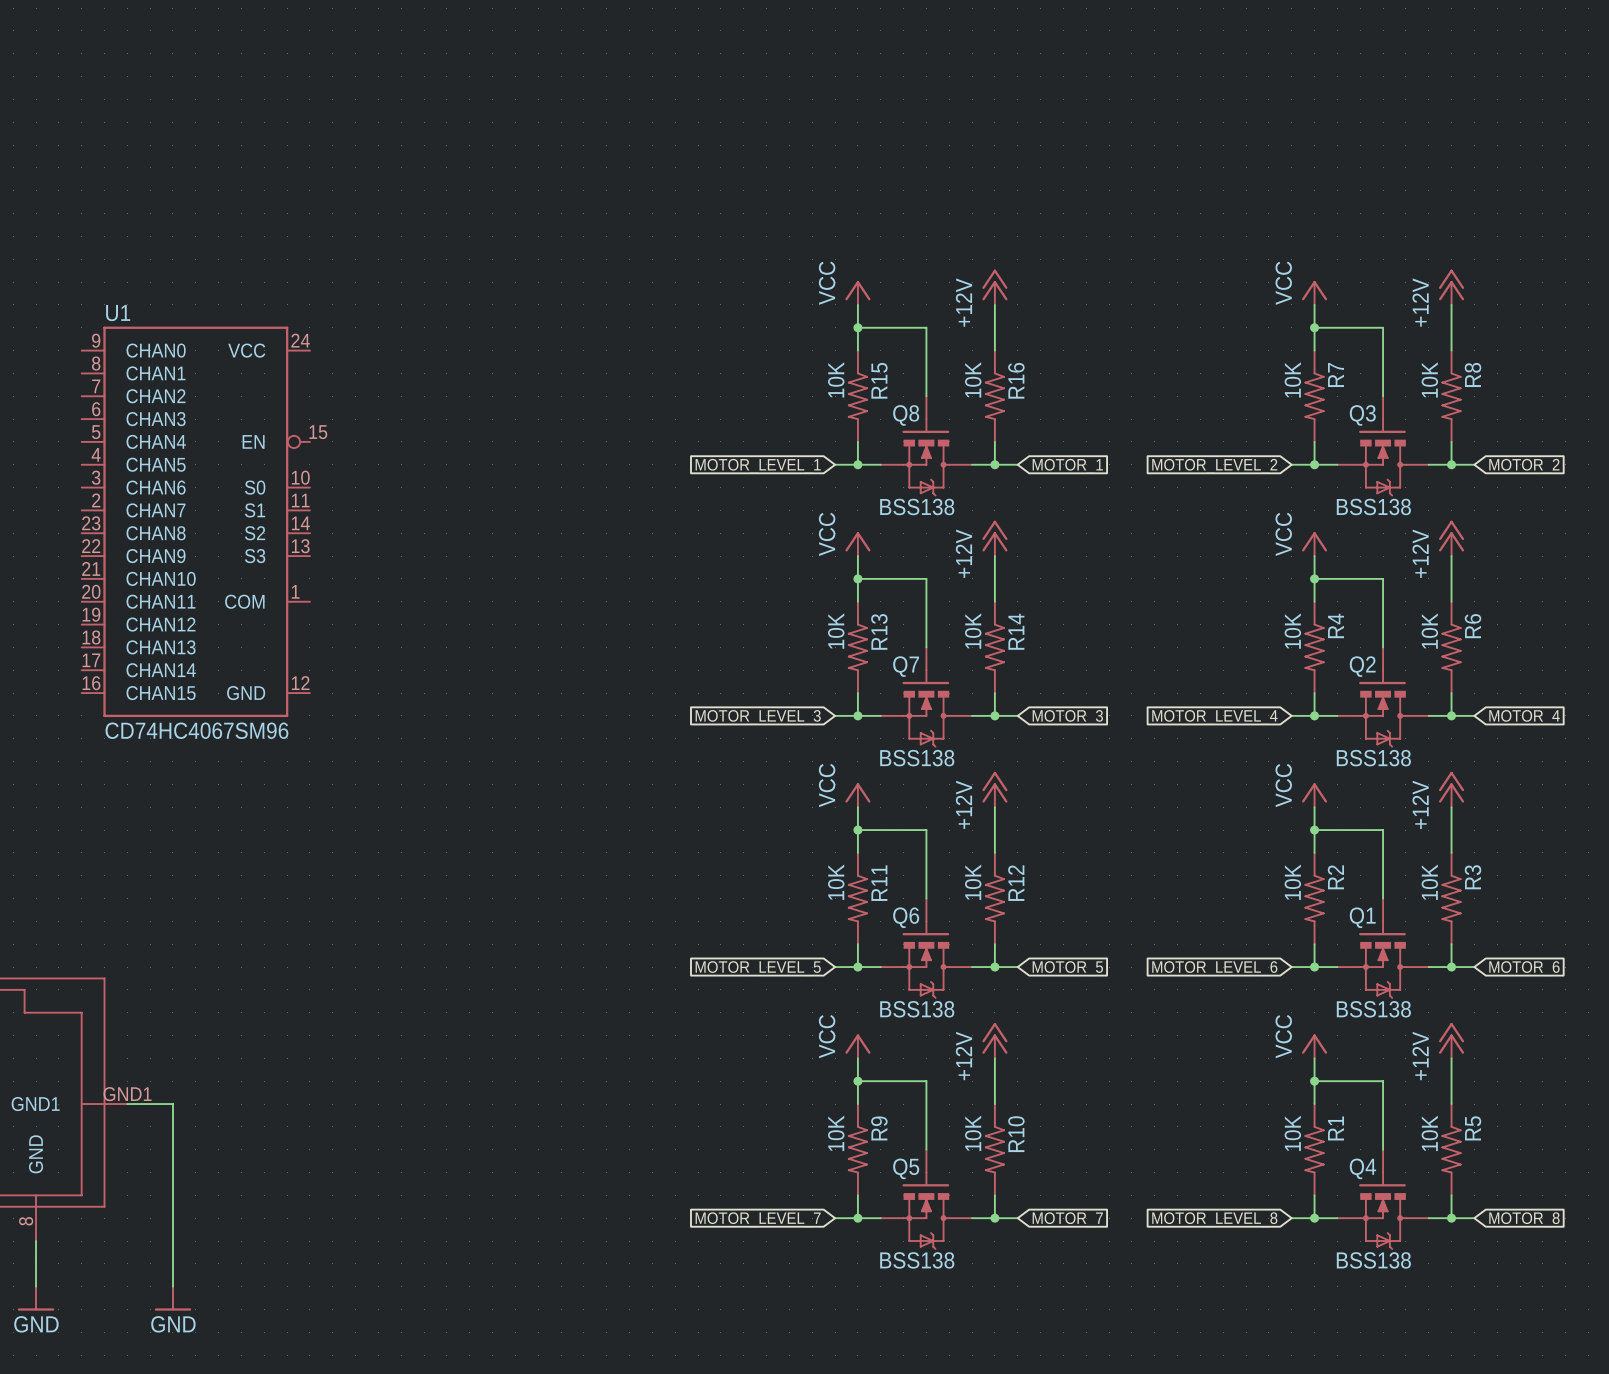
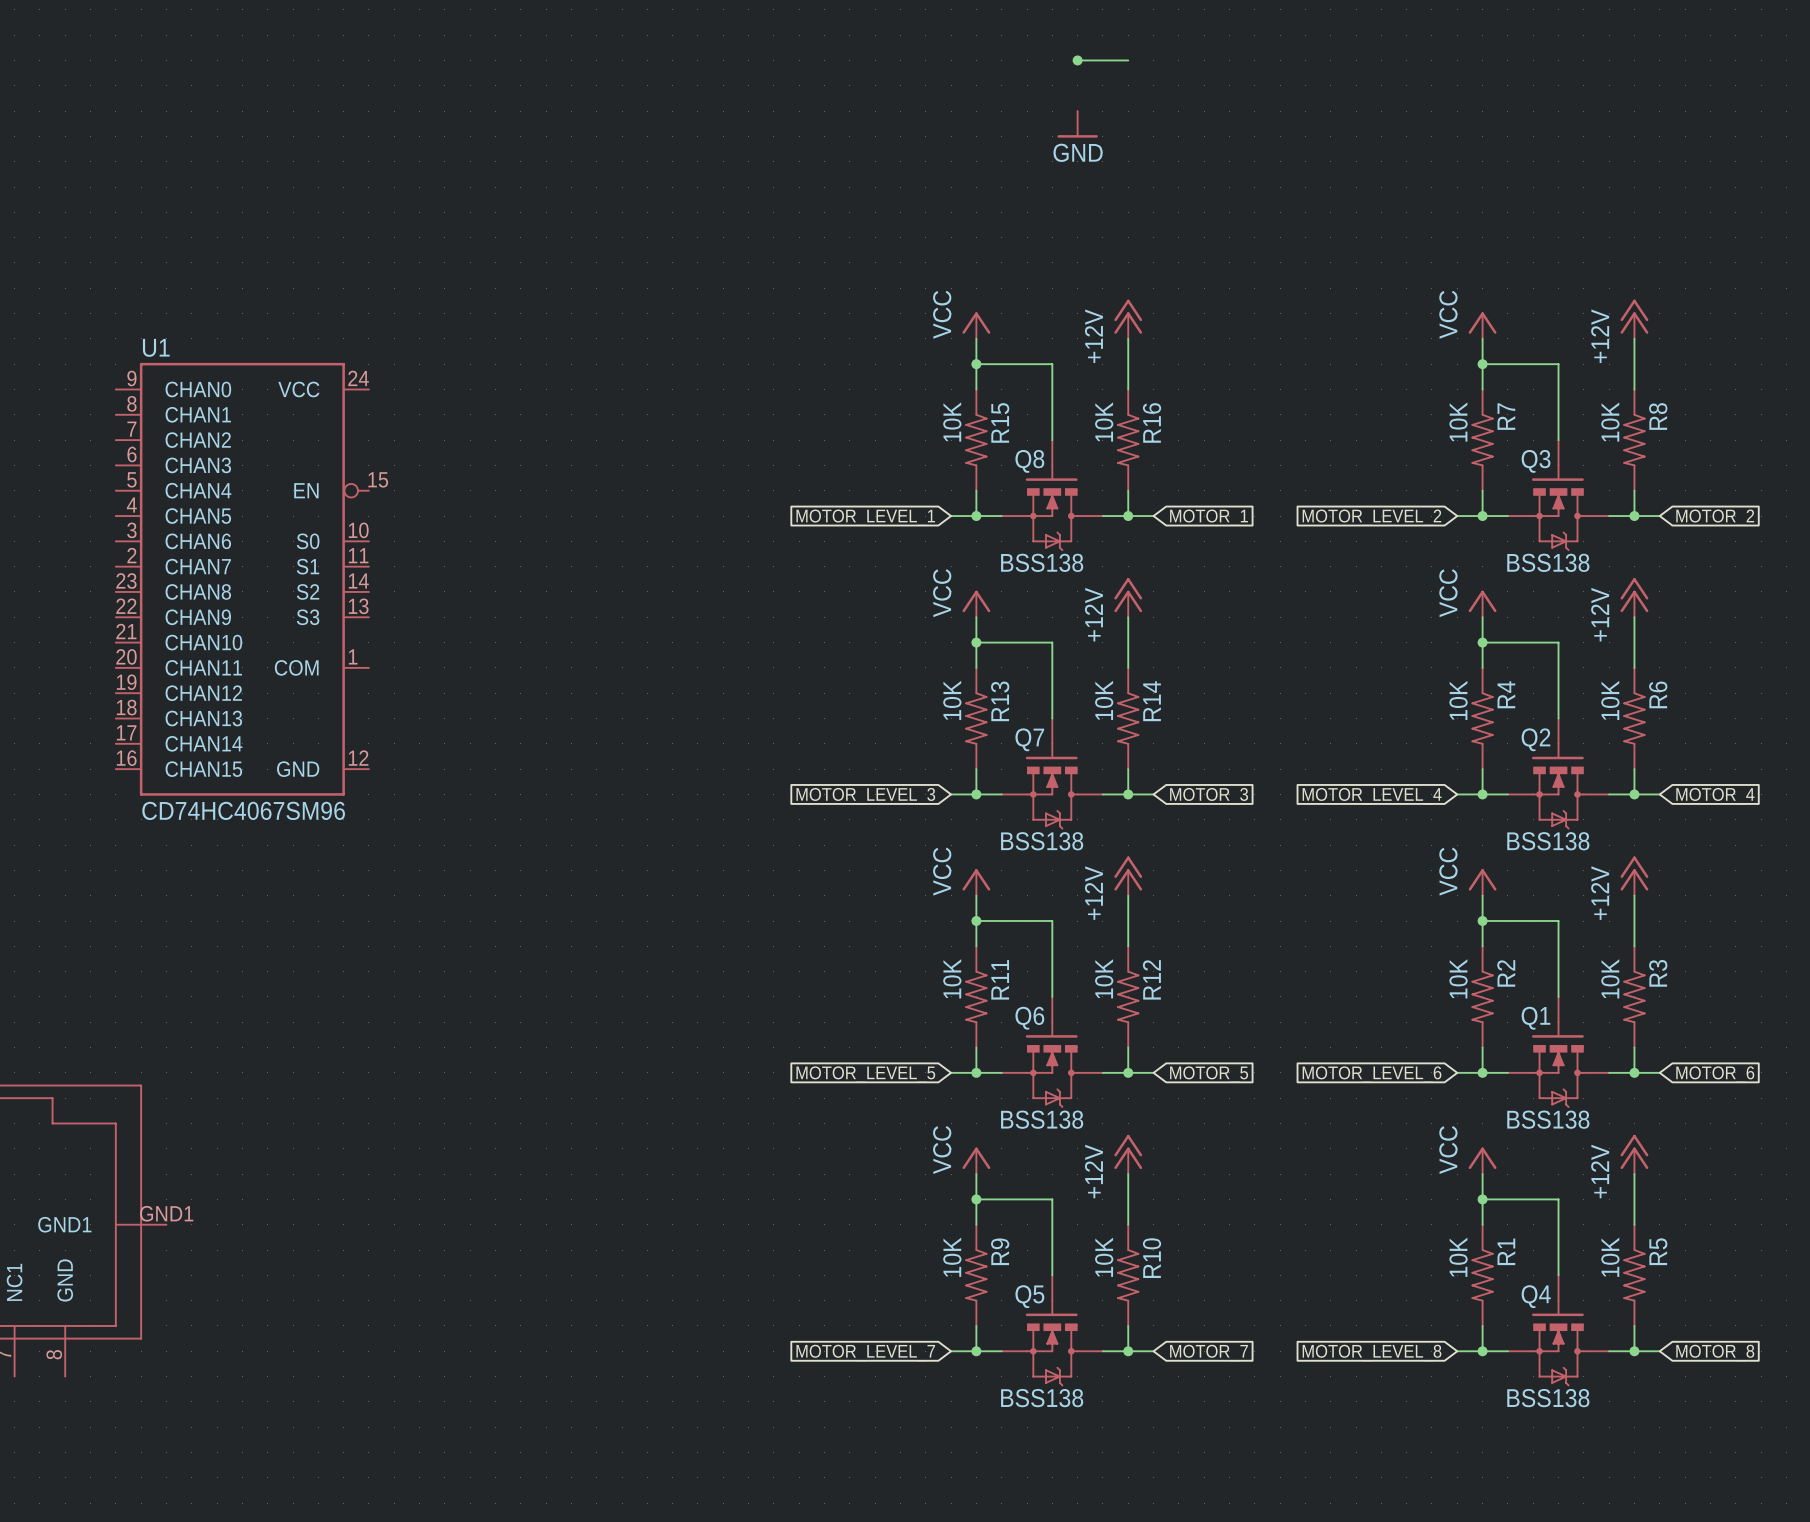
wire: none -> (1077, 60) (1128, 60)
junction: none -> (1077, 60)
power symbol: none -> GND (1077, 124)
wire: (127, 1104) (172, 1104) (172, 1286) -> none
wire: (36, 1241) (36, 1286) -> none
power symbol: GND (36, 1298) -> none
power symbol: GND (172, 1298) -> none

